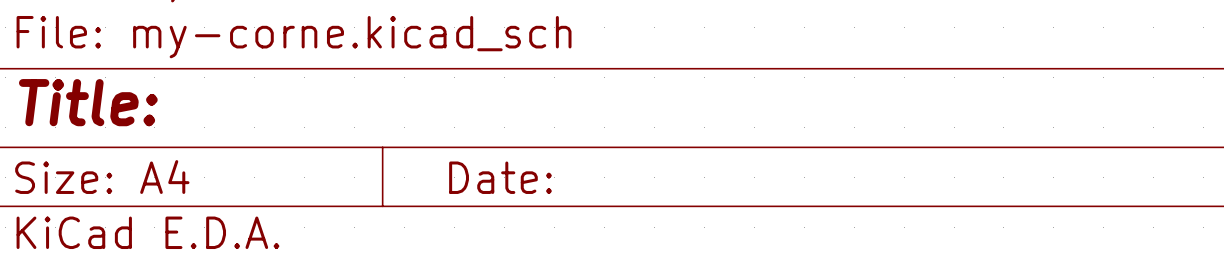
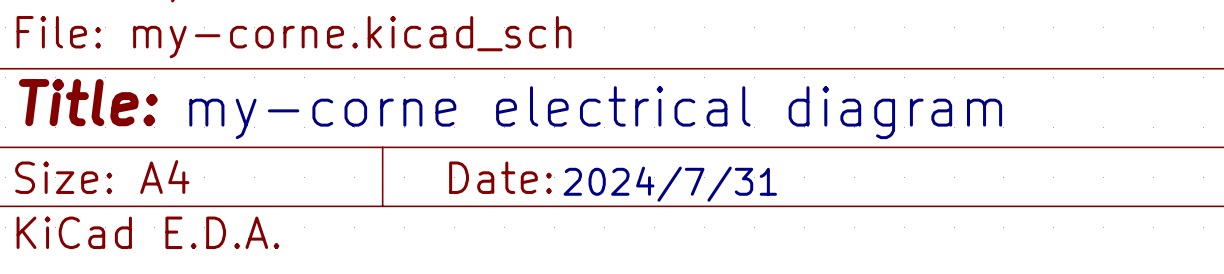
text: none -> my-corne electrical diagram (595, 112)
text: none -> 2024/7/31 (670, 184)

